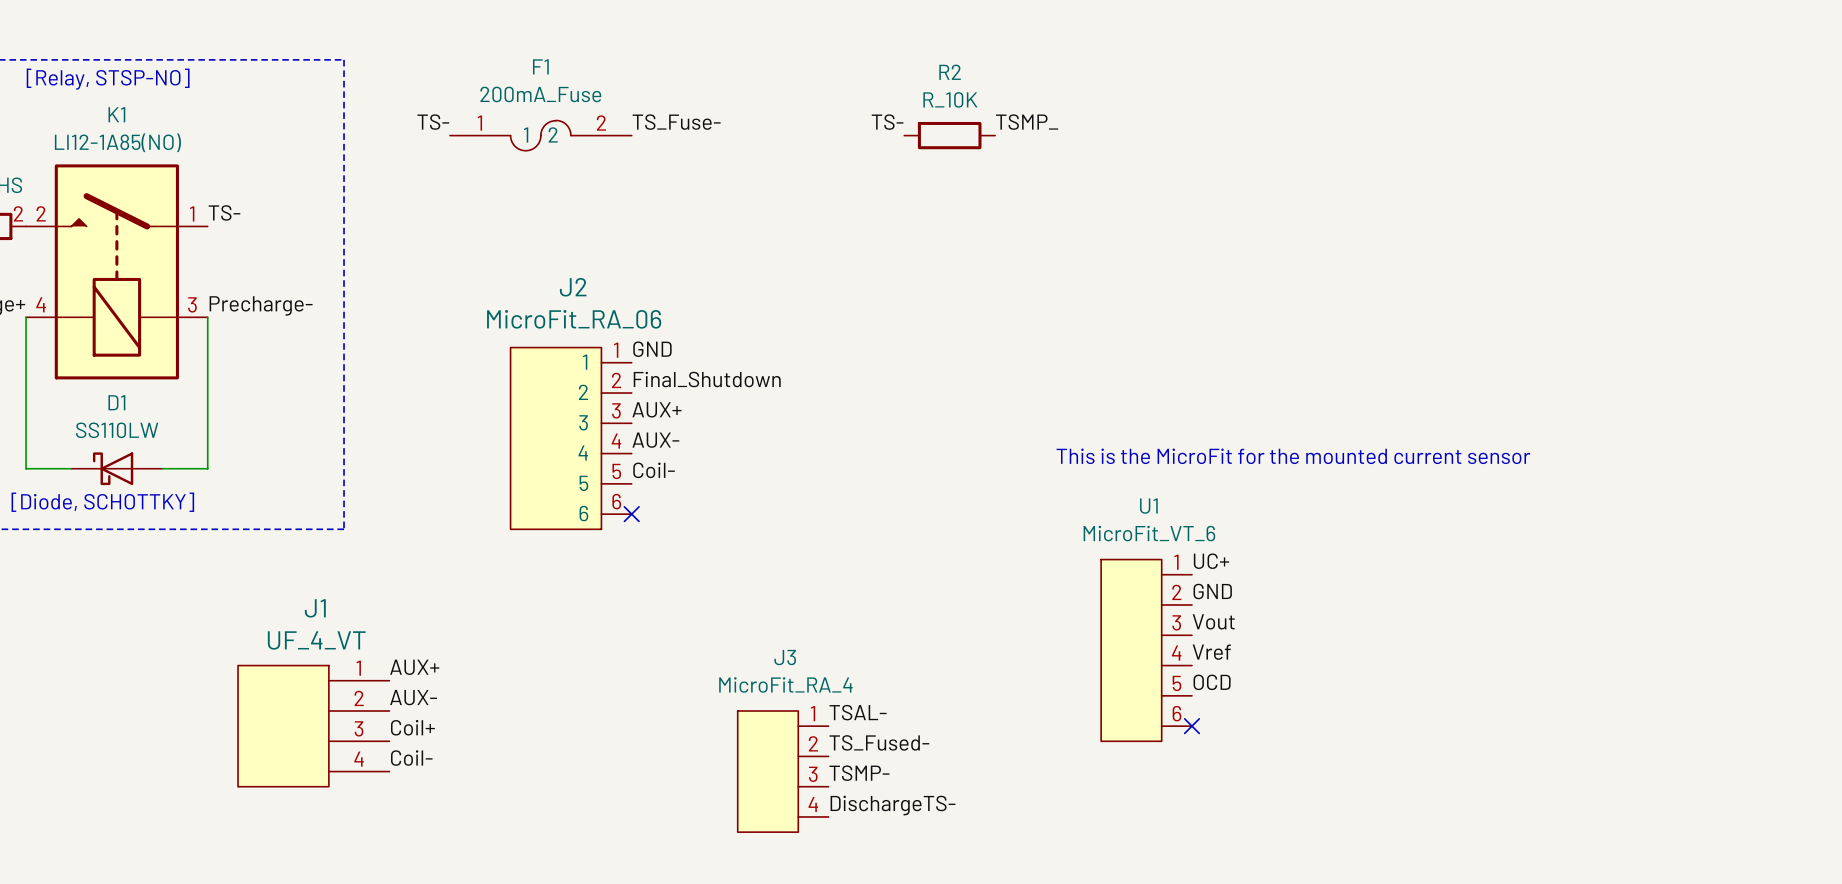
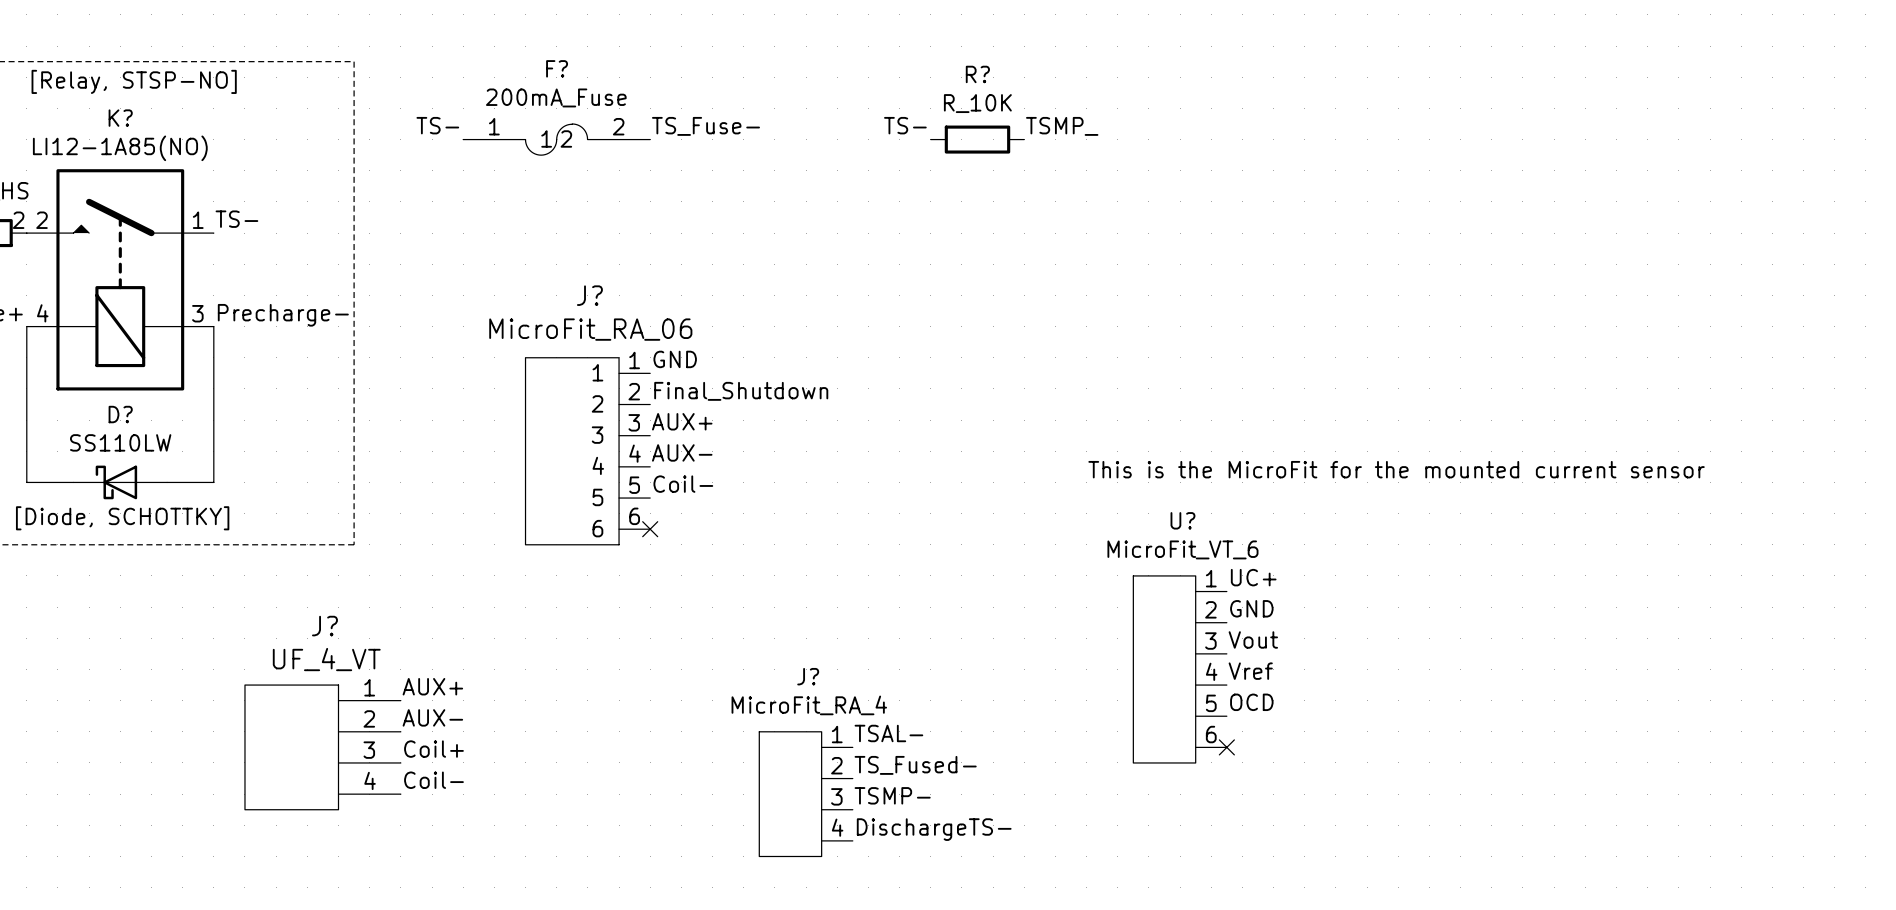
F1 name: F1 (540, 66) -> F? (557, 68)
R2 name: R2 (950, 72) -> R? (977, 74)
K1 name: K1 (116, 114) -> K? (120, 118)
J2 name: J2 (573, 287) -> J? (589, 295)
D1 name: D1 (116, 402) -> D? (120, 414)
U1 name: U1 (1148, 506) -> U? (1182, 520)
J1 name: J1 (315, 608) -> J? (324, 626)
J3 name: J3 (785, 657) -> J? (808, 676)

